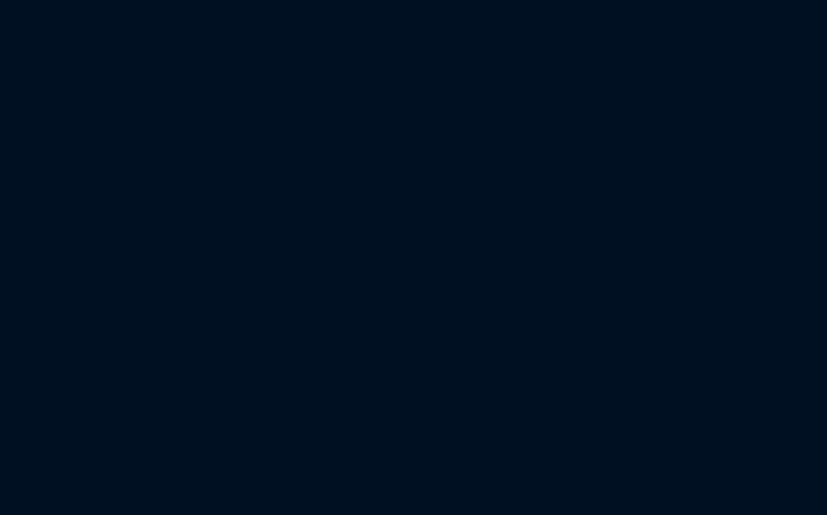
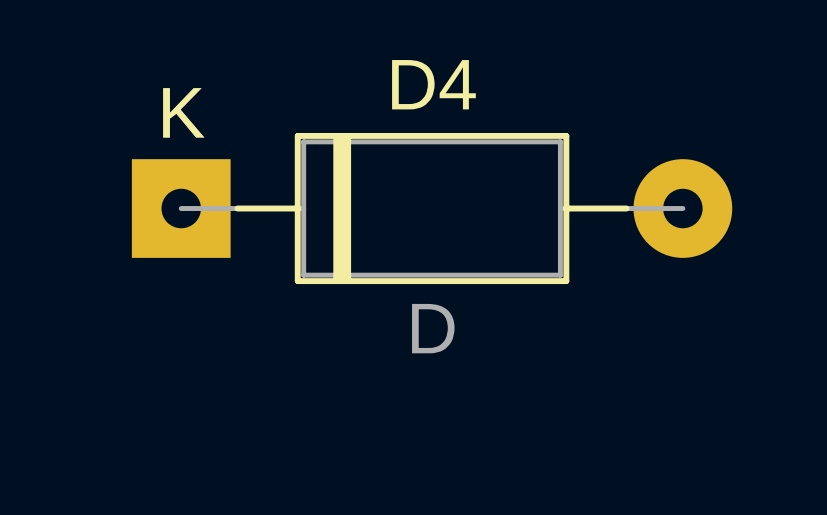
D4: none -> D (432, 208)

